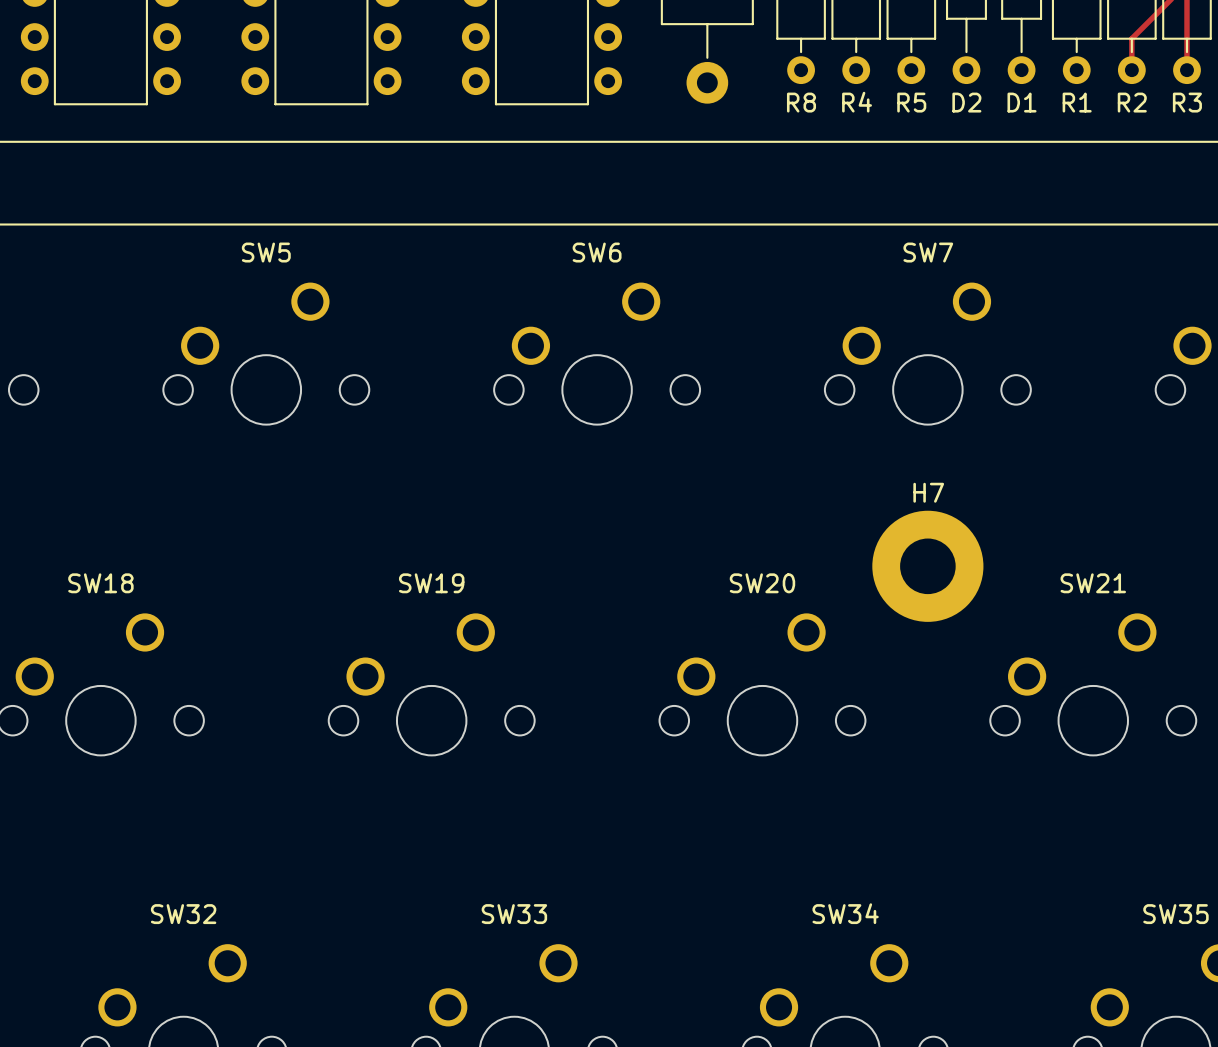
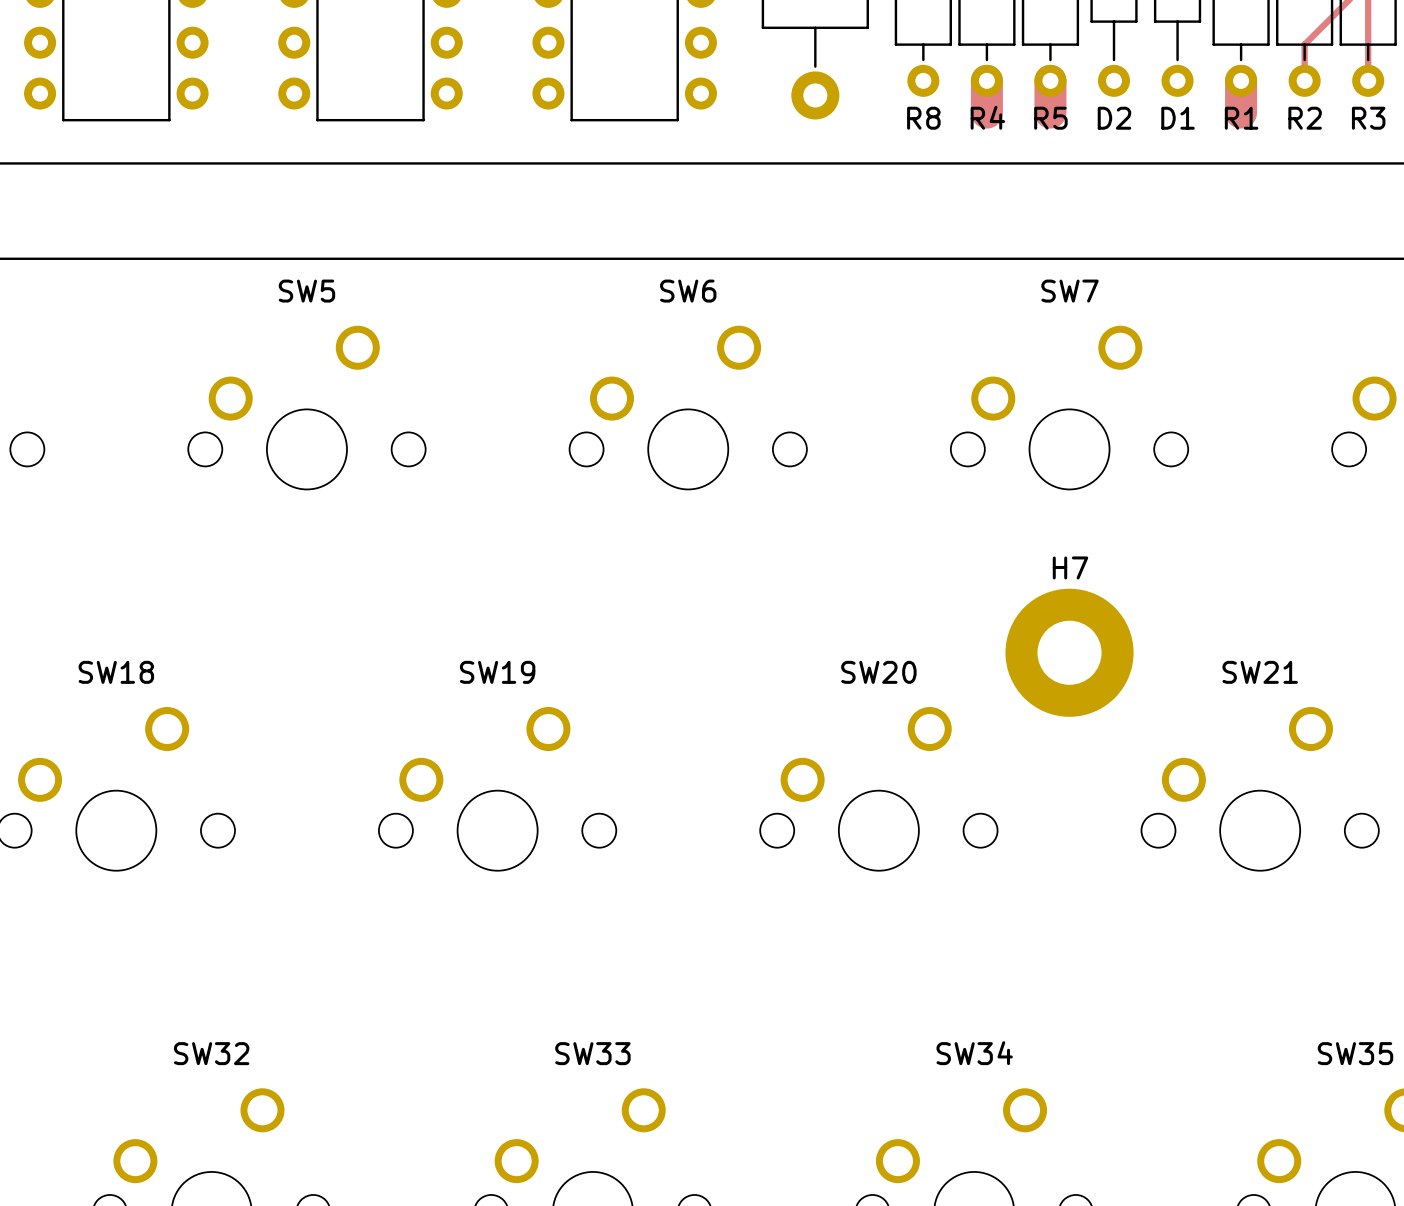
top track: none -> (986, 80) (986, 112)
top track: none -> (1050, 80) (1050, 112)
top track: none -> (1241, 80) (1241, 112)

